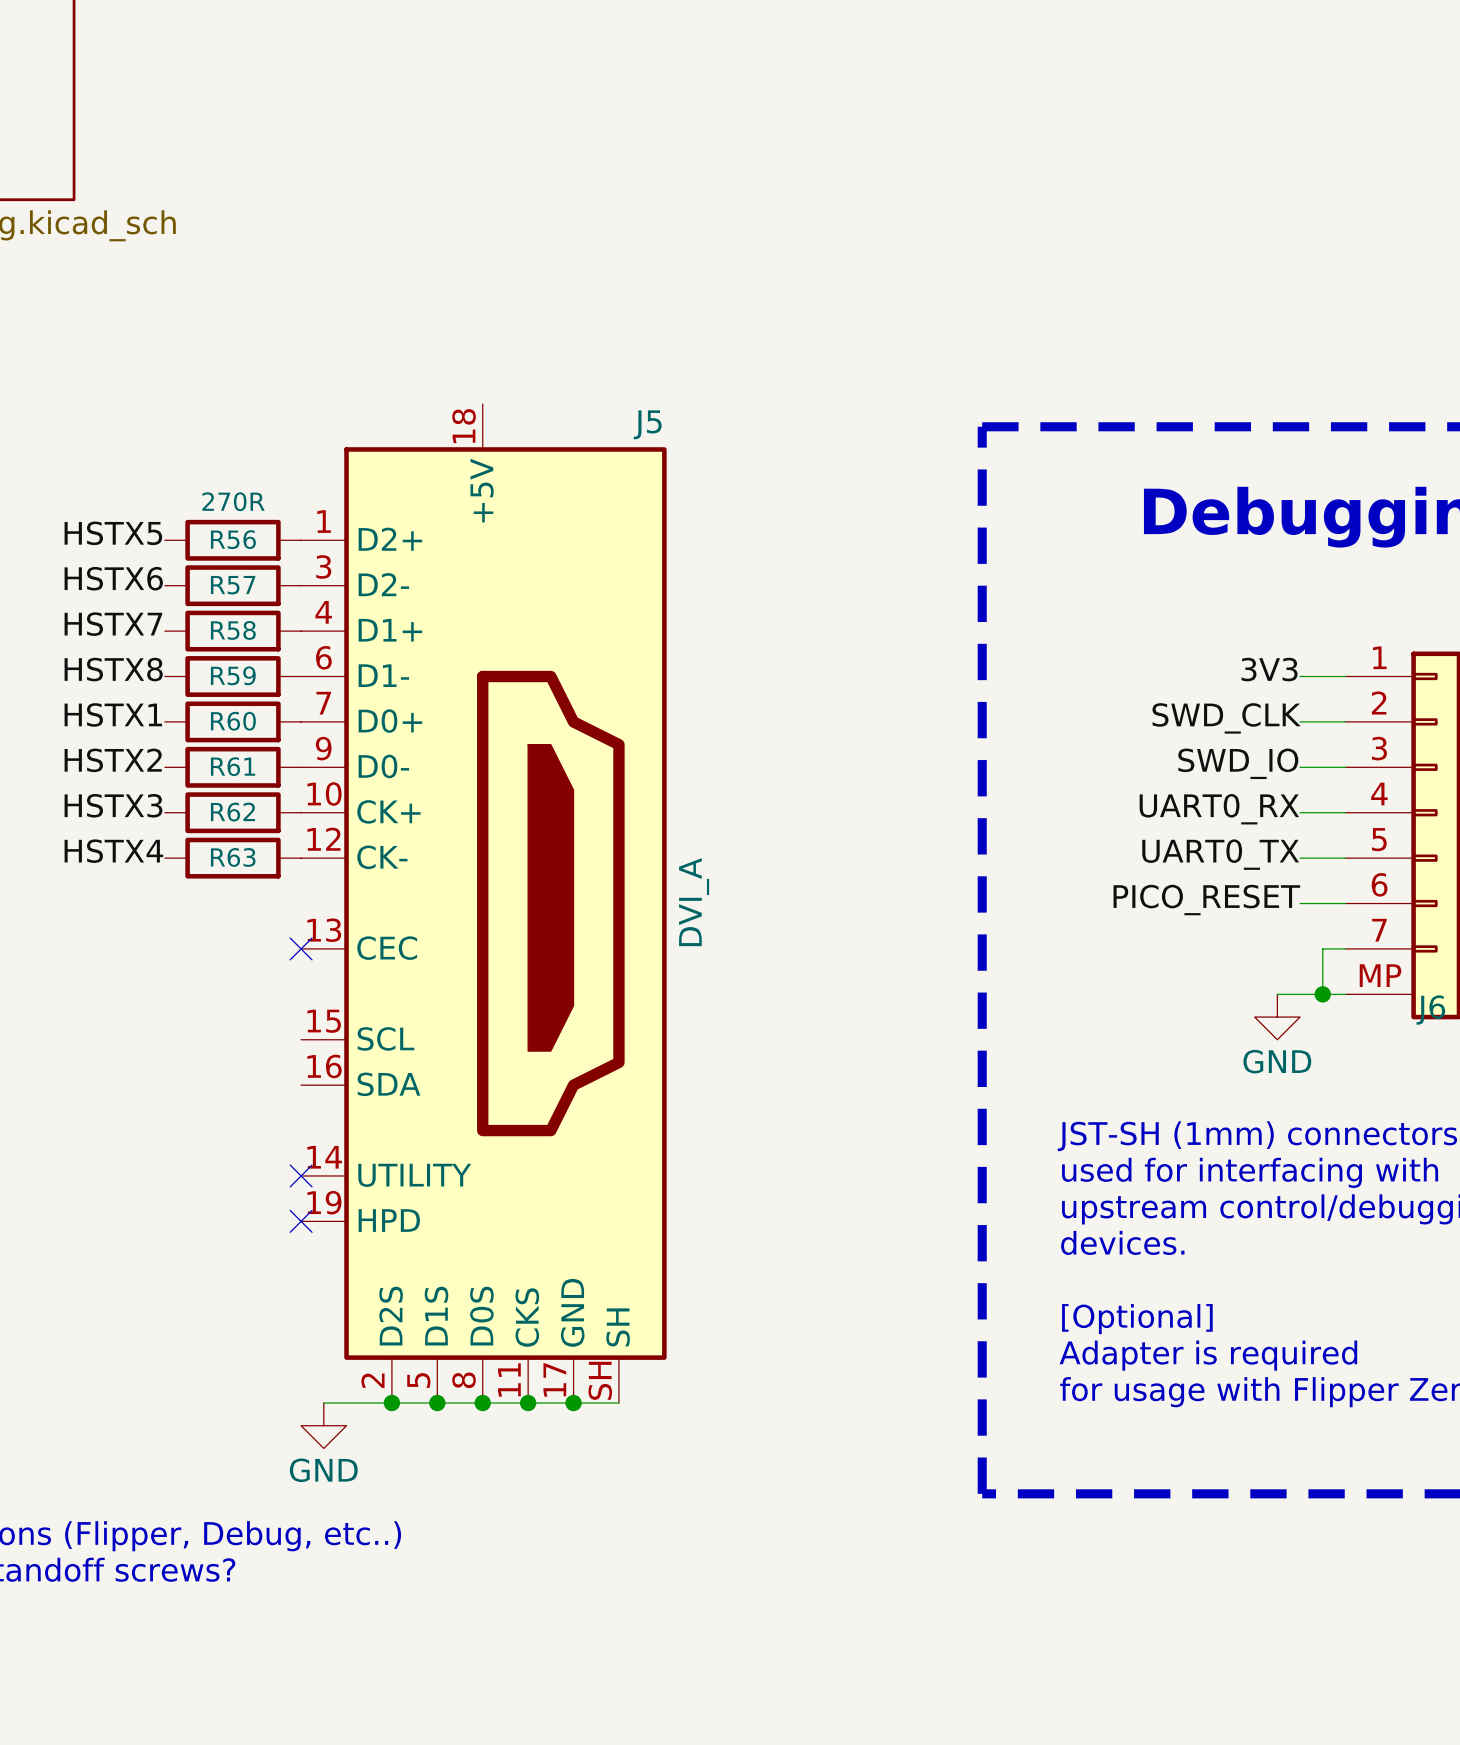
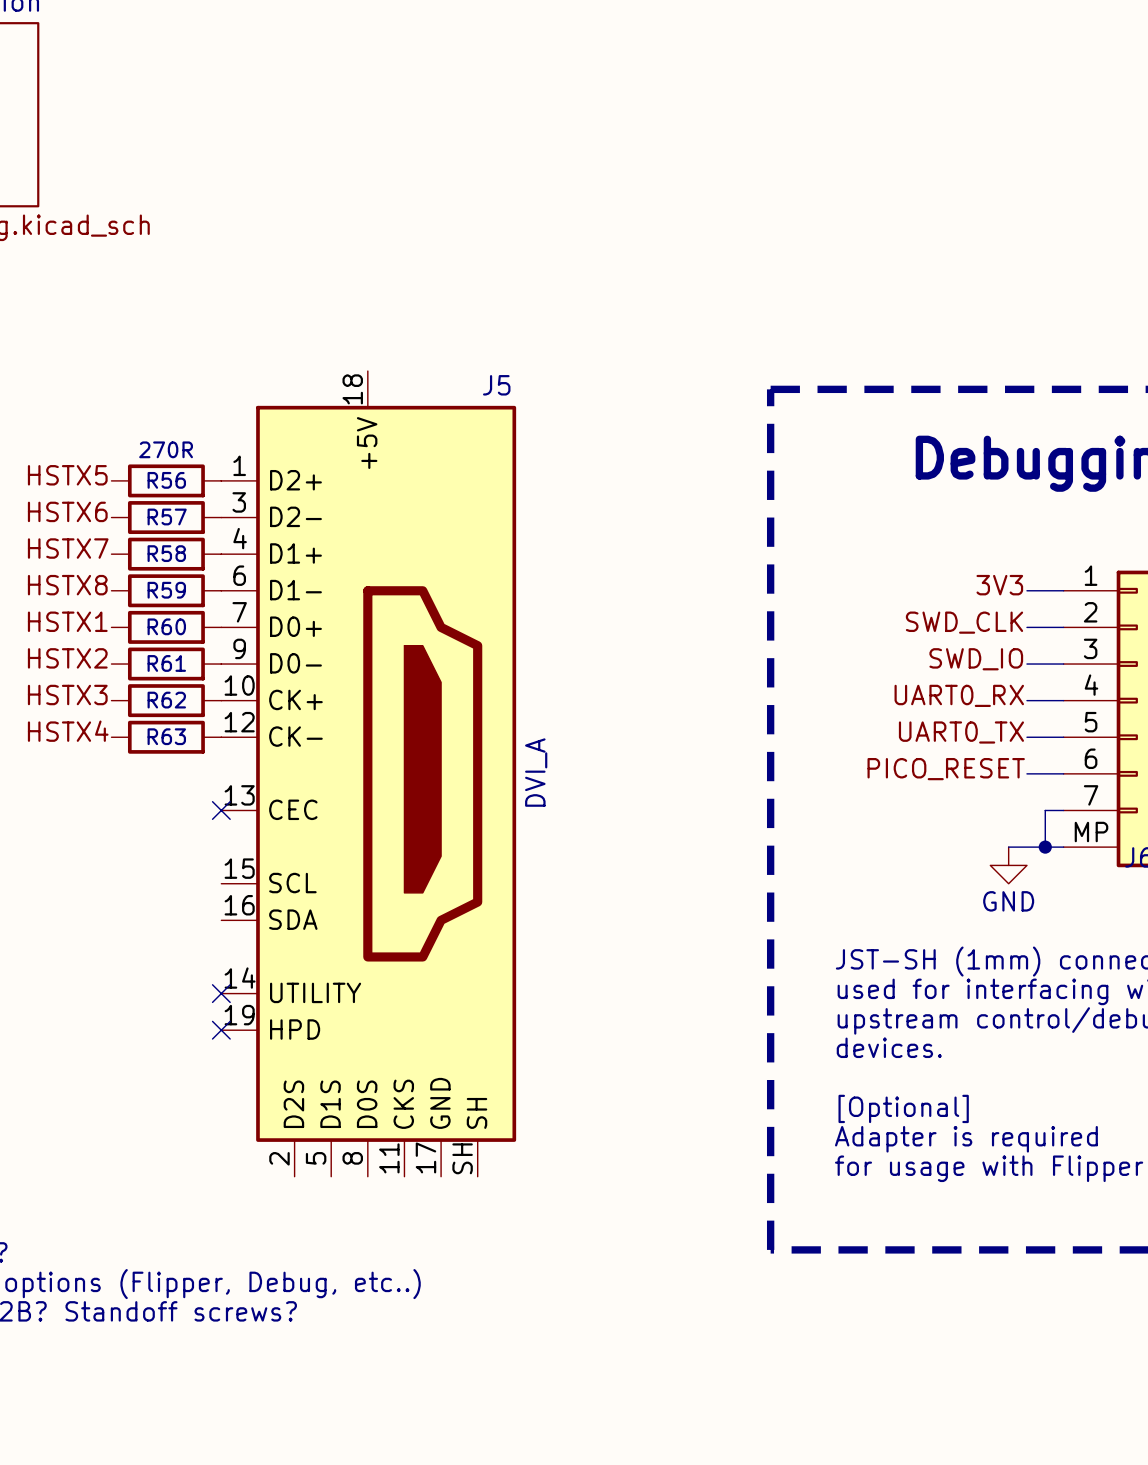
wire: (323, 1403) (618, 1403) -> none
junction: (391, 1403) -> none
junction: (437, 1403) -> none
junction: (482, 1403) -> none
junction: (528, 1403) -> none
junction: (573, 1403) -> none
power symbol: GND (323, 1425) -> none

